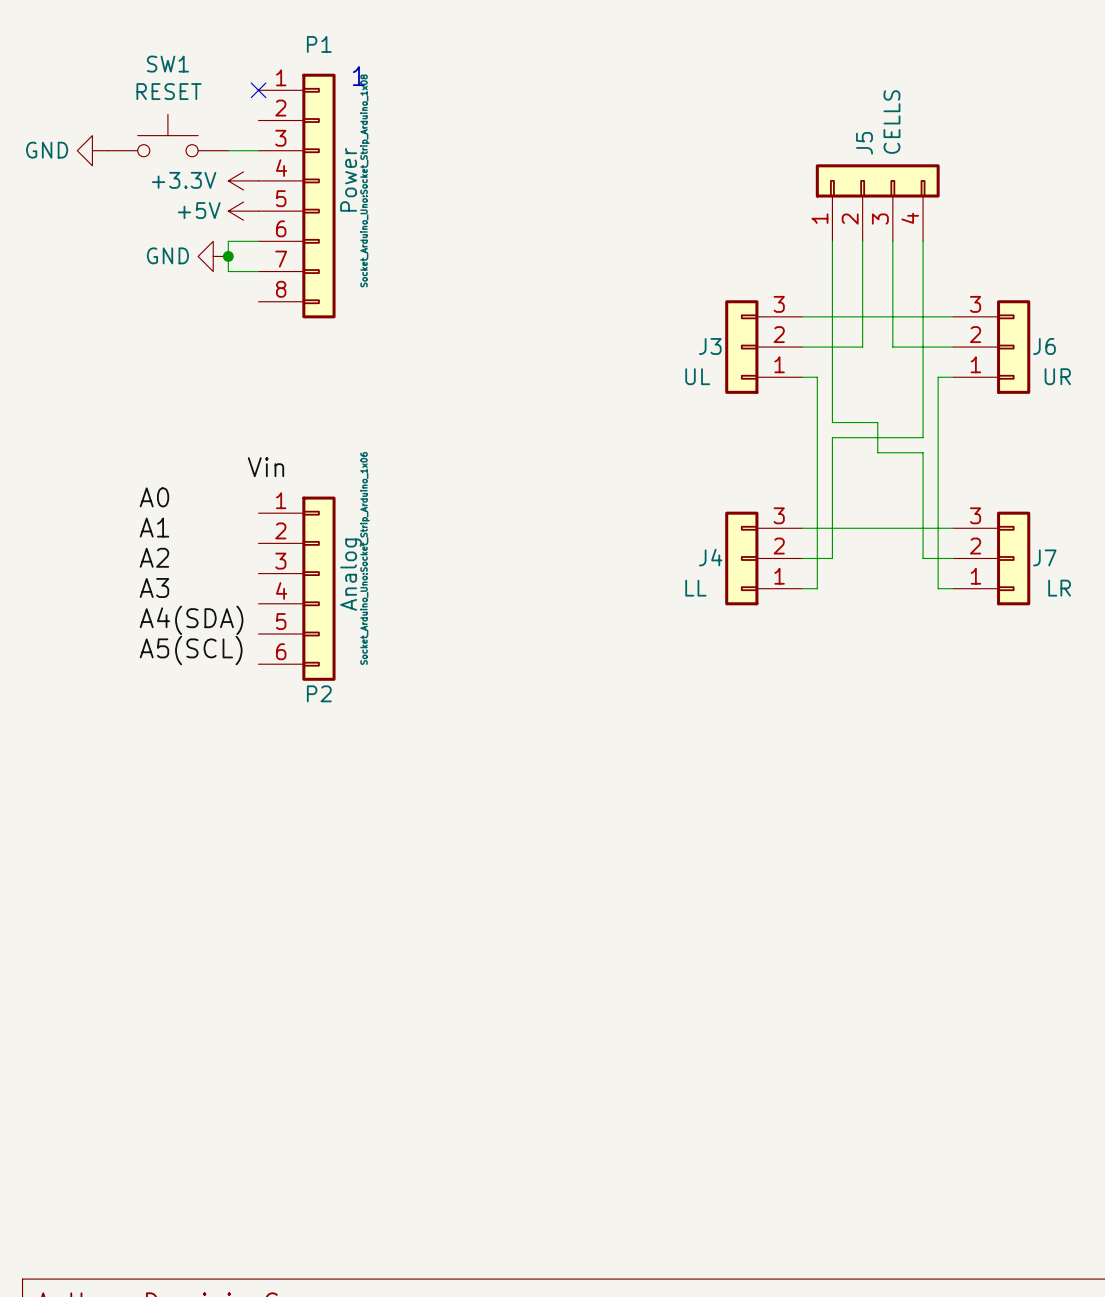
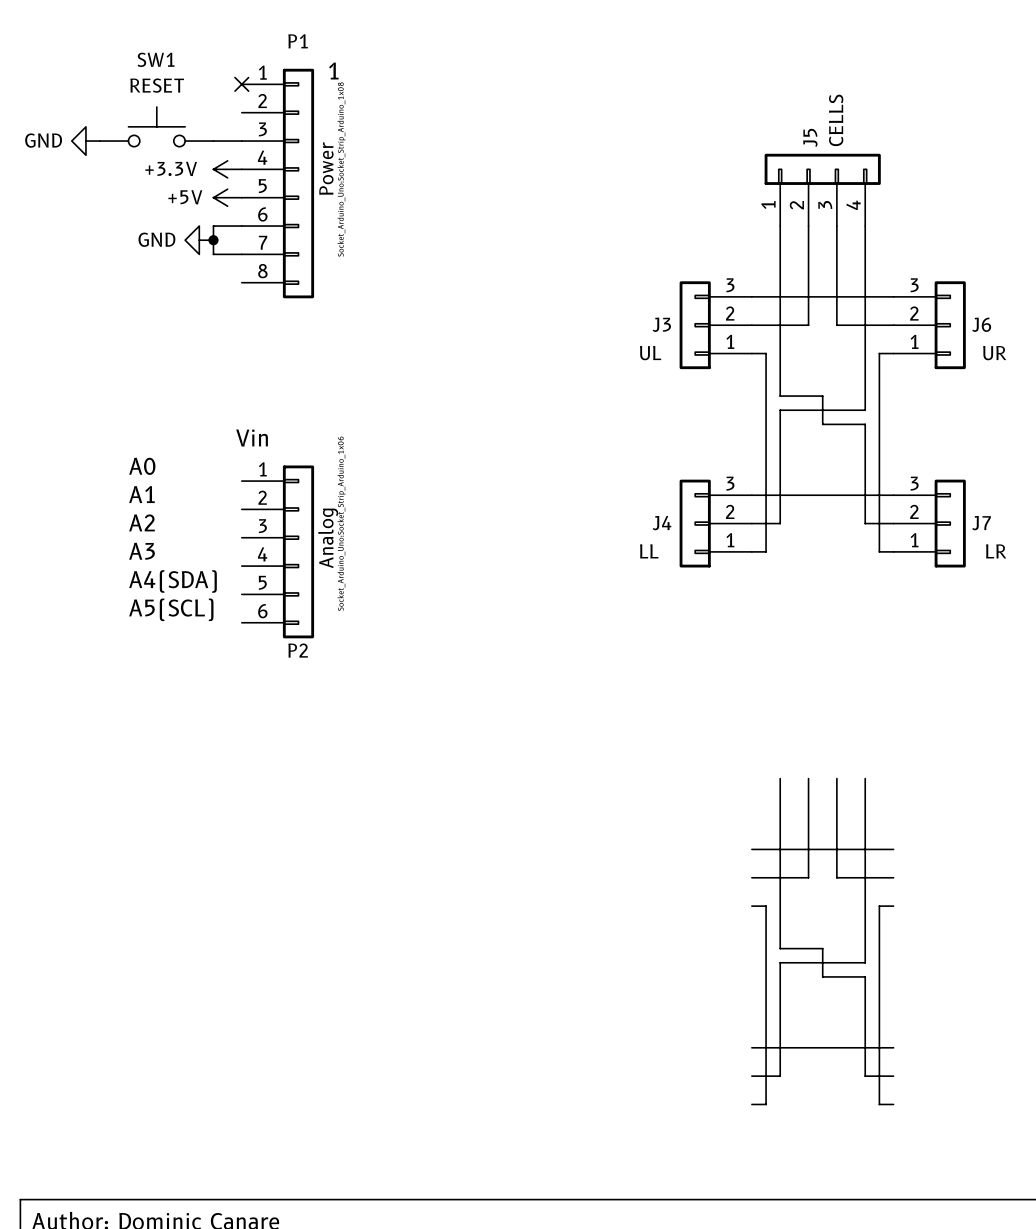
wire: none -> (780, 778) (780, 948) (822, 948) (822, 976) (865, 976) (865, 1076) (893, 1076)
wire: none -> (808, 778) (808, 877) (751, 877)
wire: none -> (836, 778) (836, 877) (893, 877)
wire: none -> (865, 778) (865, 962) (780, 962) (780, 1076) (751, 1076)
wire: none -> (751, 849) (893, 849)
wire: none -> (751, 906) (766, 906) (766, 1104) (751, 1104)
wire: none -> (893, 906) (879, 906) (879, 1104) (893, 1104)
wire: none -> (751, 1047) (893, 1047)

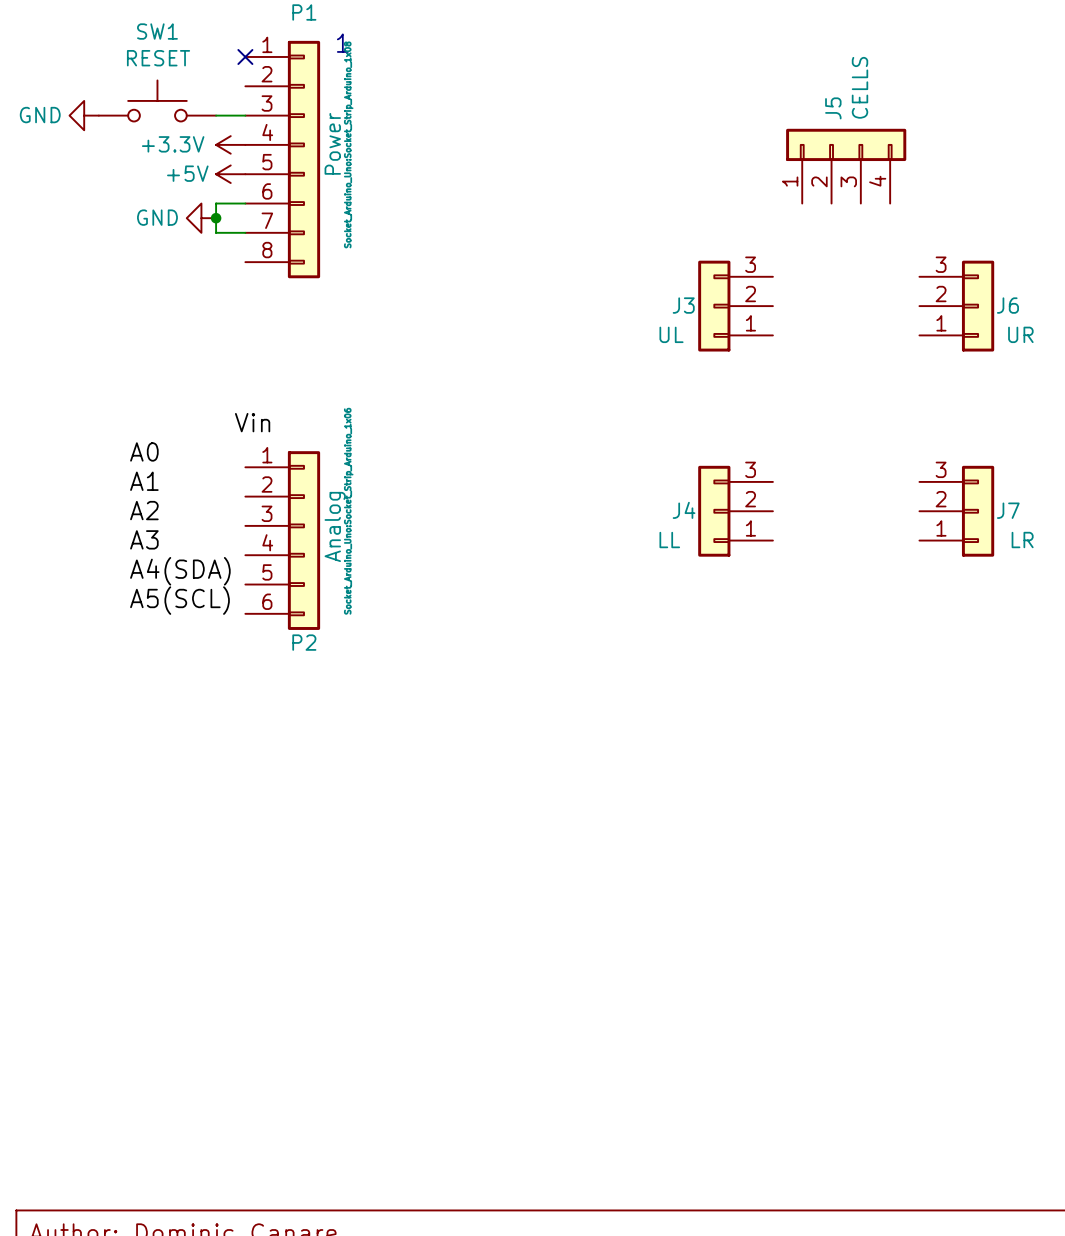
wire: (780, 226) (780, 396) (822, 396) (822, 424) (865, 424) (865, 523) (893, 523) -> none
wire: (808, 226) (808, 325) (751, 325) -> none
wire: (836, 226) (836, 325) (893, 325) -> none
wire: (865, 226) (865, 410) (780, 410) (780, 523) (751, 523) -> none
wire: (751, 296) (893, 296) -> none
wire: (751, 353) (766, 353) (766, 551) (751, 551) -> none
wire: (893, 353) (879, 353) (879, 551) (893, 551) -> none
wire: (751, 495) (893, 495) -> none
wire: (780, 778) (780, 948) (822, 948) (822, 976) (865, 976) (865, 1076) (893, 1076) -> none
wire: (808, 778) (808, 877) (751, 877) -> none
wire: (836, 778) (836, 877) (893, 877) -> none
wire: (865, 778) (865, 962) (780, 962) (780, 1076) (751, 1076) -> none
wire: (751, 849) (893, 849) -> none
wire: (751, 906) (766, 906) (766, 1104) (751, 1104) -> none
wire: (893, 906) (879, 906) (879, 1104) (893, 1104) -> none
wire: (751, 1047) (893, 1047) -> none

